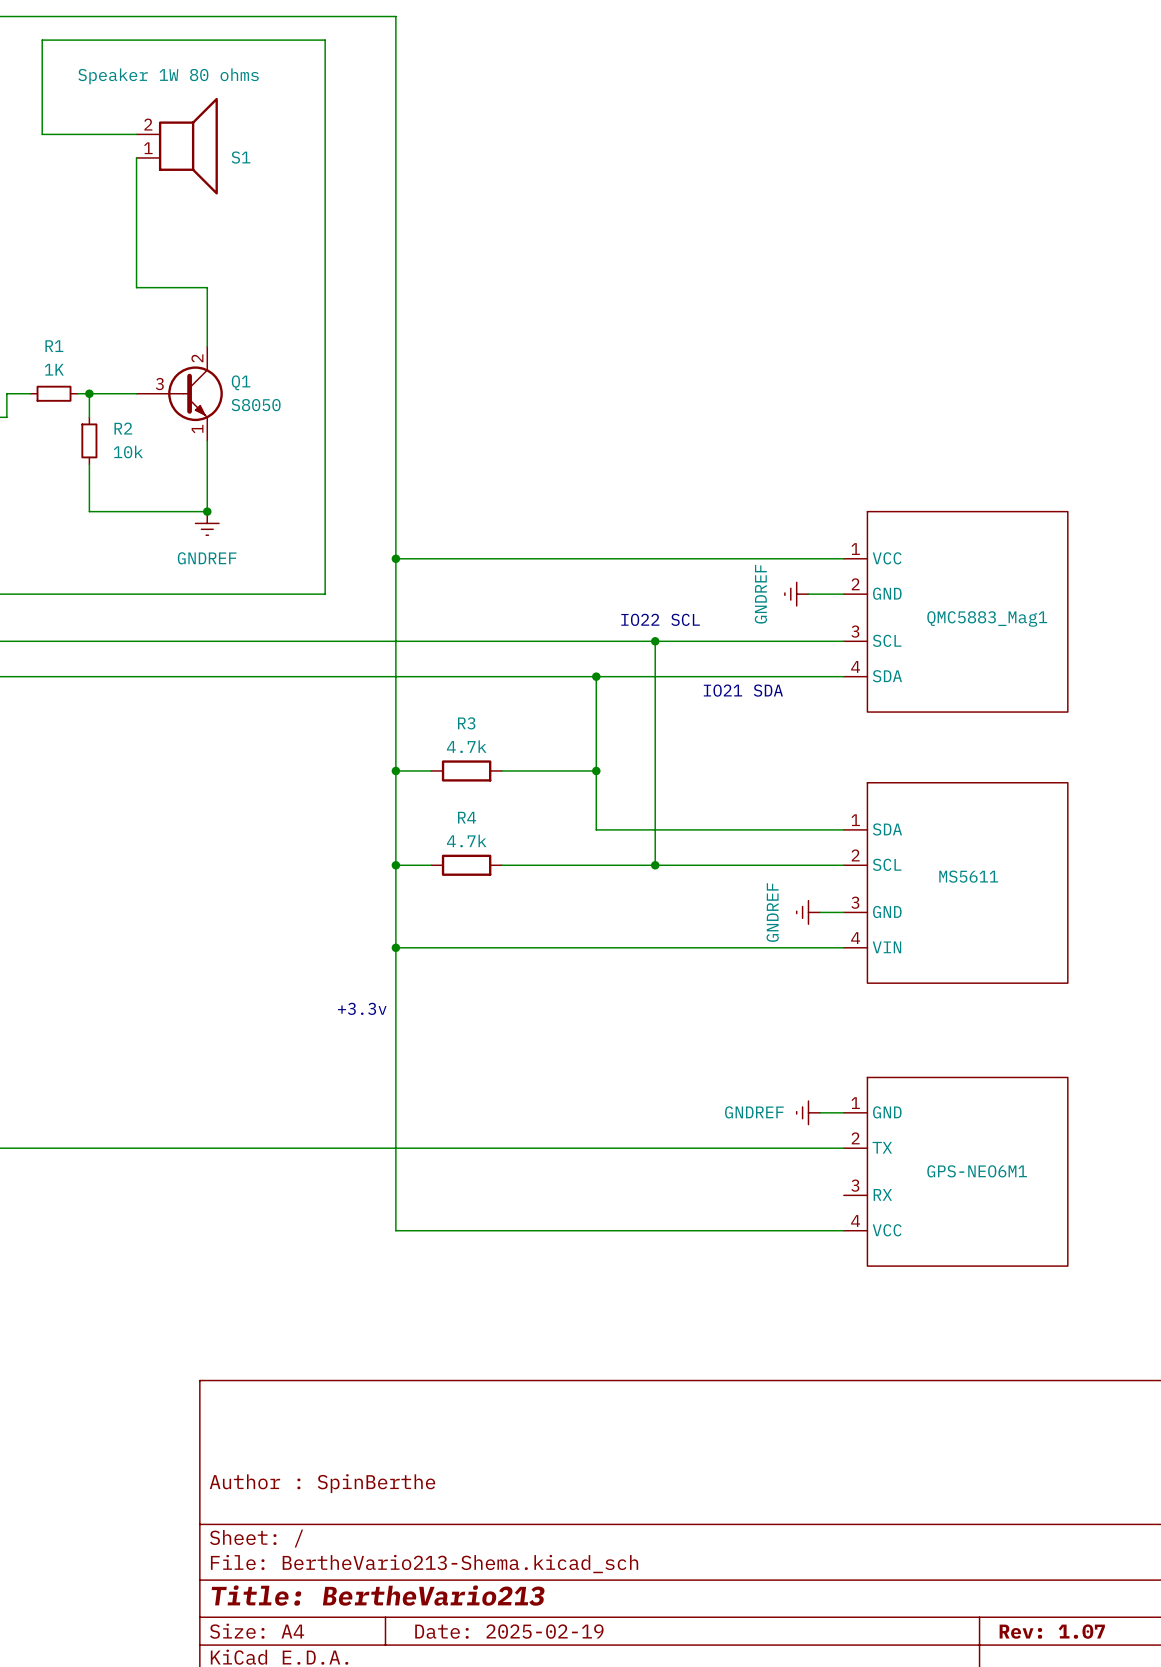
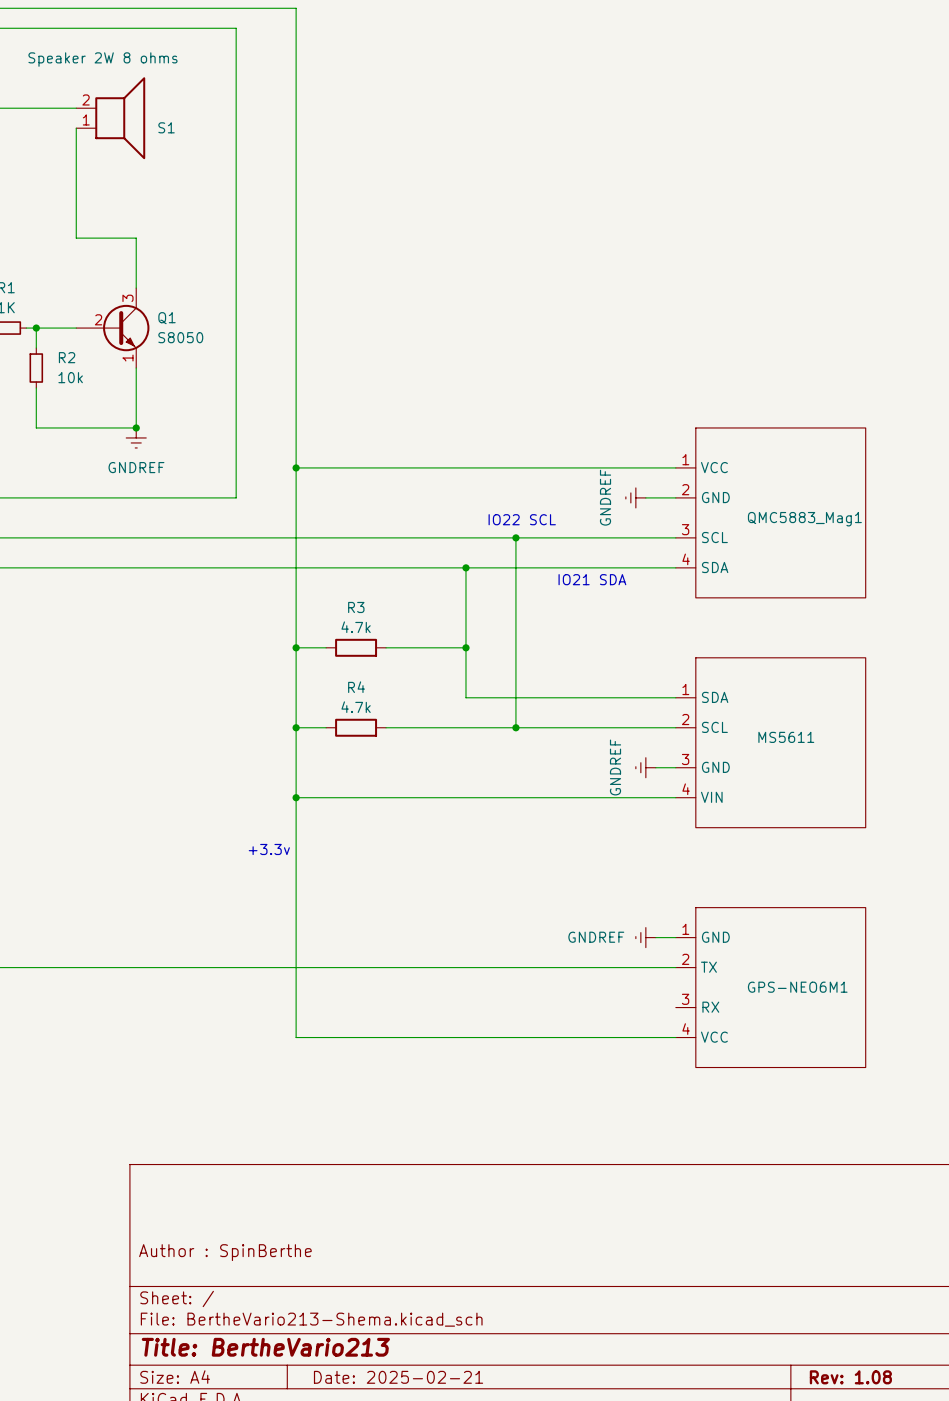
S1 value: Speaker 1W 80 ohms (168, 76) -> Speaker 2W 8 ohms (102, 59)
Q1 symbol: [136, 346, 223, 441] -> [76, 288, 150, 369]
title block: Date: 2025-02-19 (509, 1631) -> Date: 2025-02-21 (398, 1377)
title block: Rev: 1.07 (1052, 1631) -> Rev: 1.08 (850, 1377)

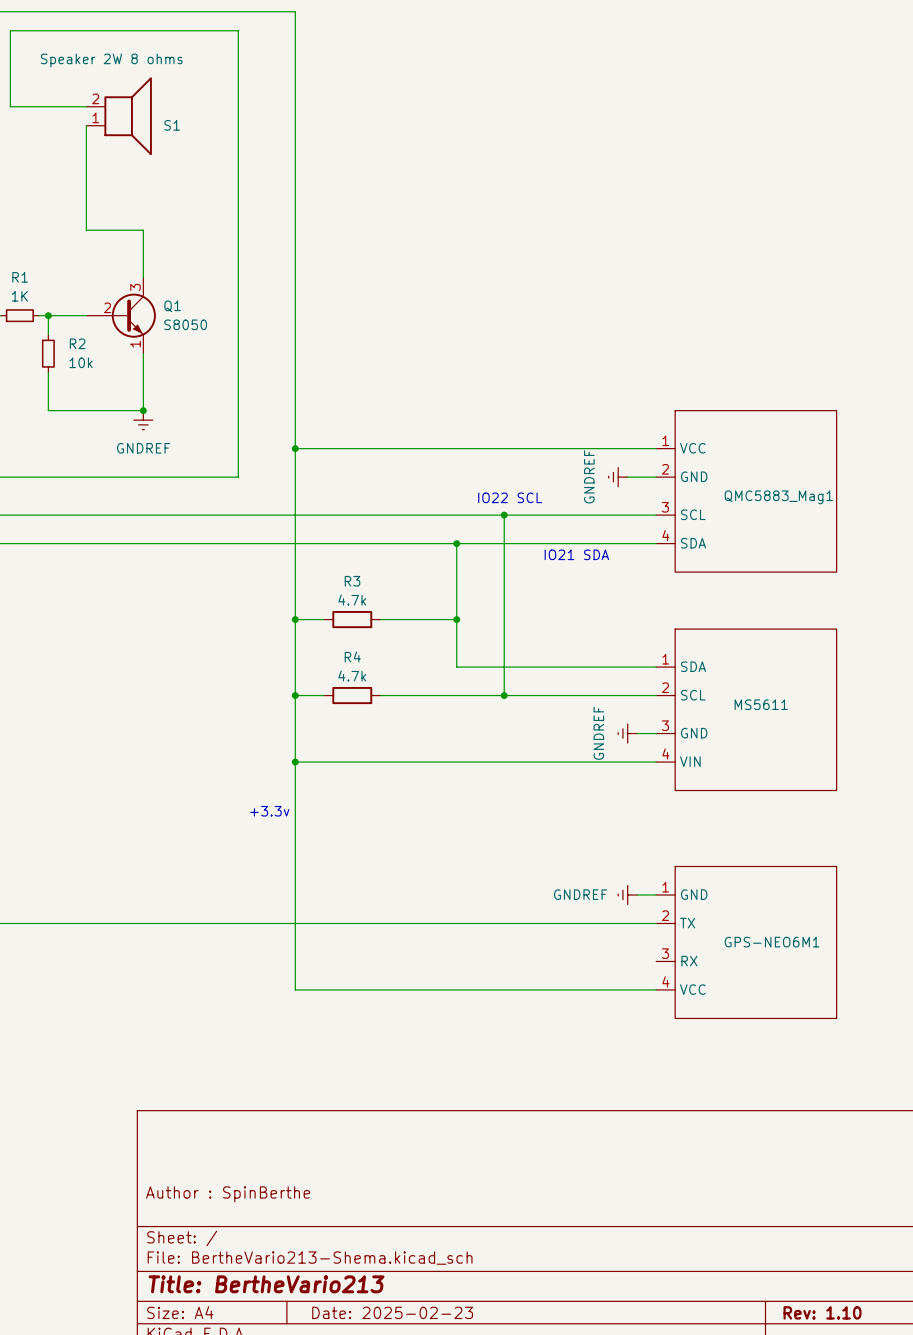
title block: Date: 2025-02-21 (398, 1377) -> Date: 2025-02-23 (392, 1312)
title block: Rev: 1.08 (850, 1377) -> Rev: 1.10 (822, 1312)

